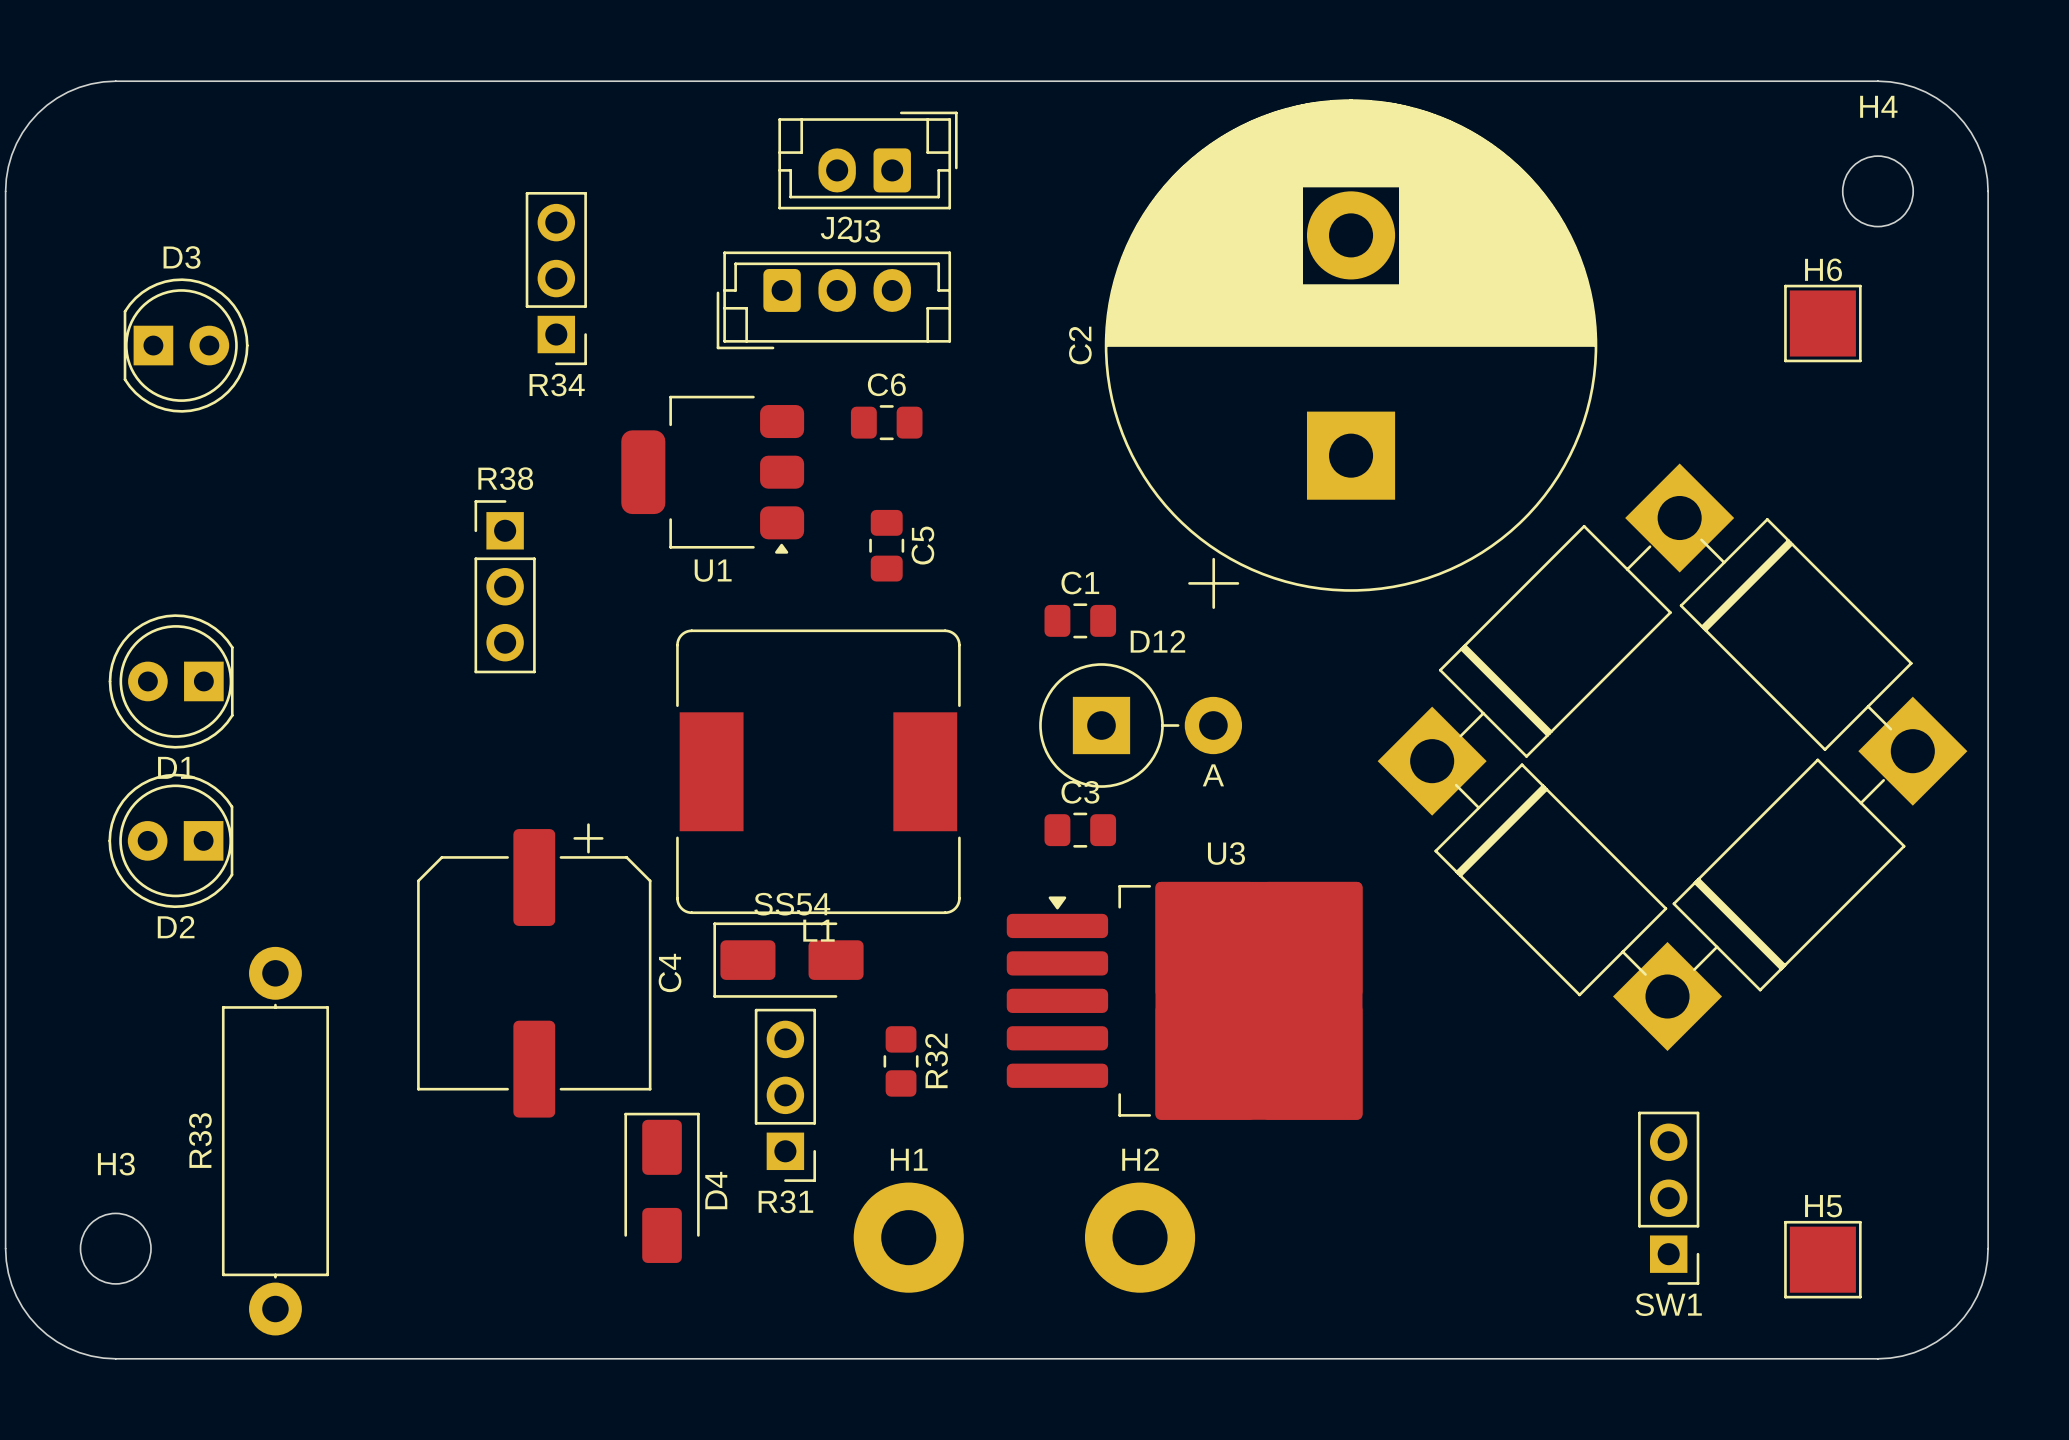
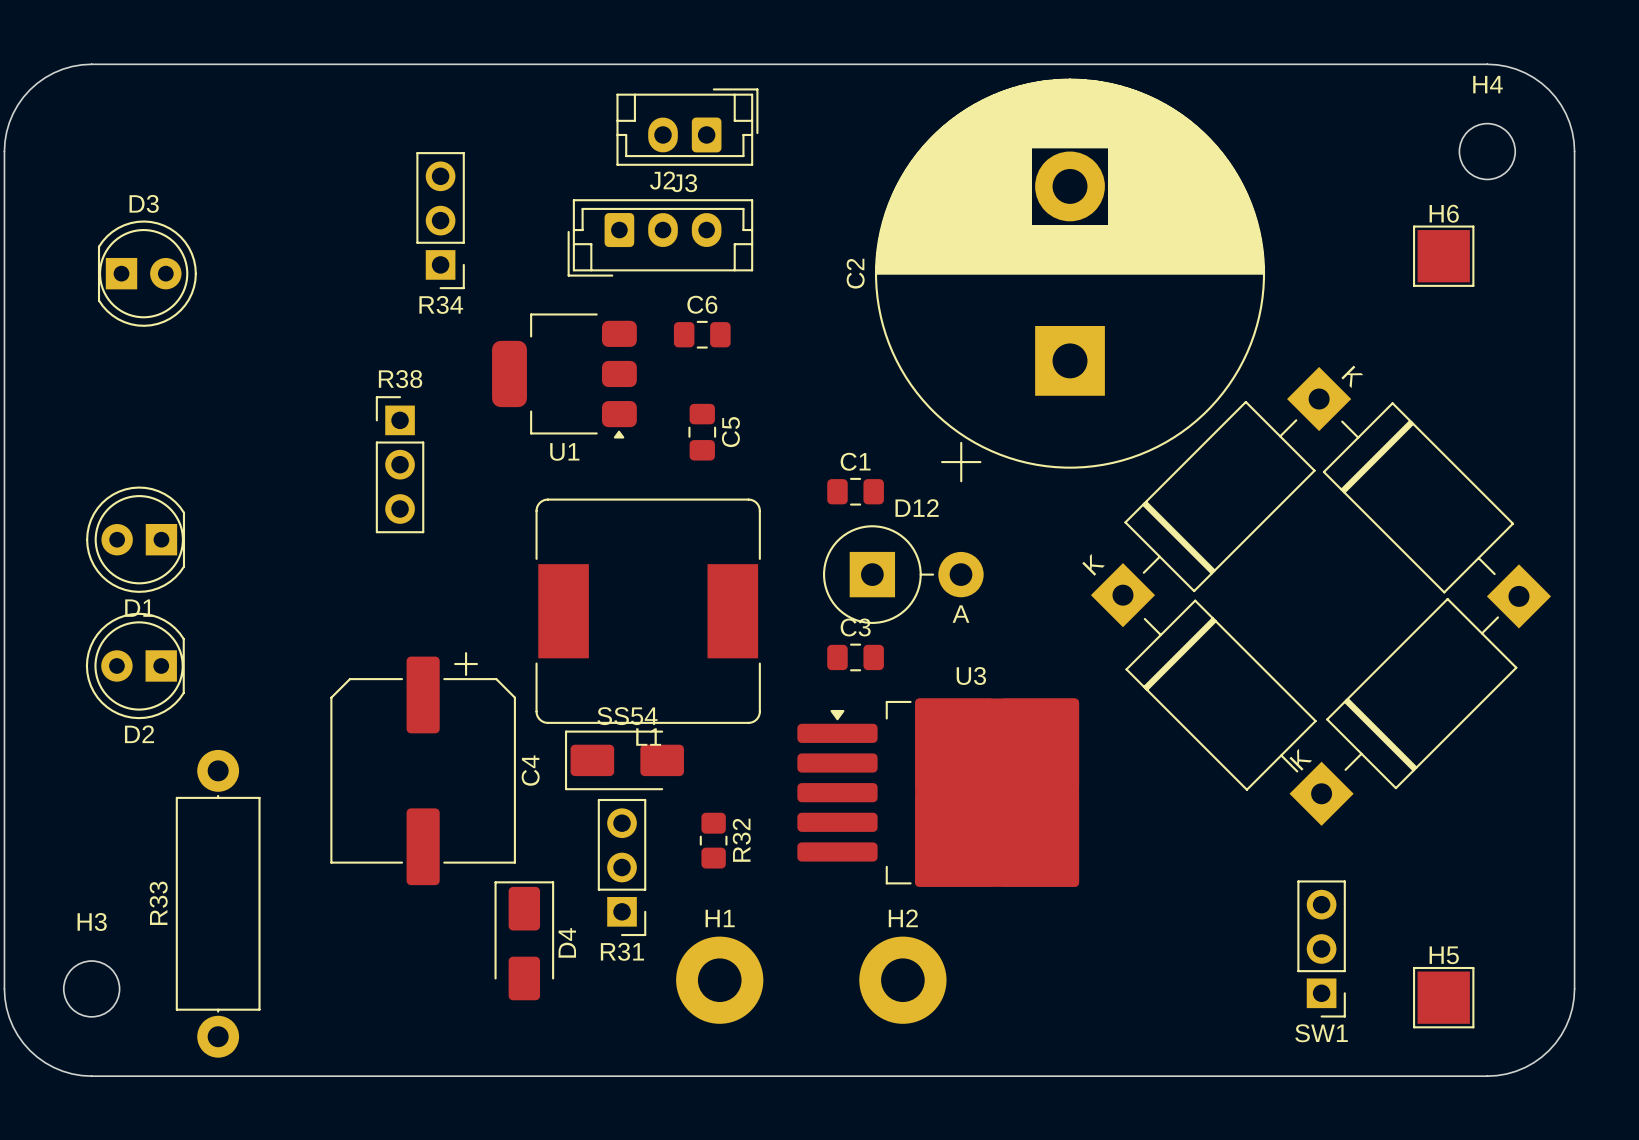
part footprint: [1377, 463, 1968, 1052] -> [1090, 366, 1552, 826]

